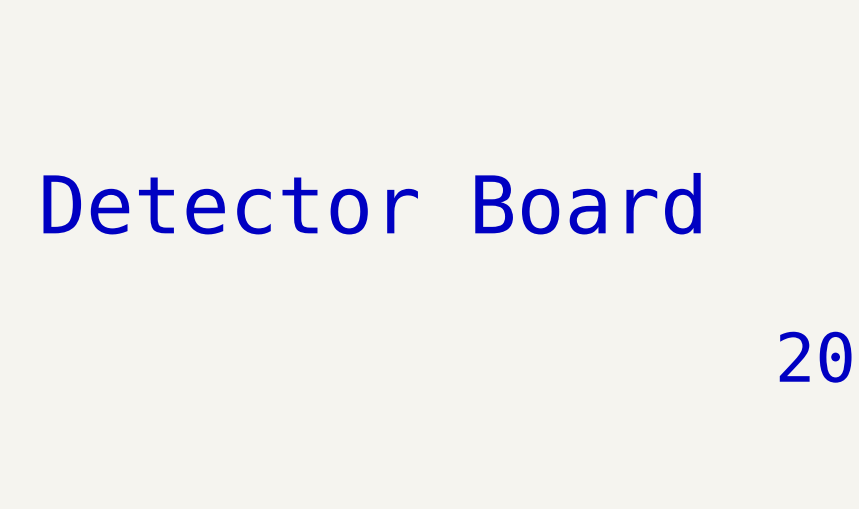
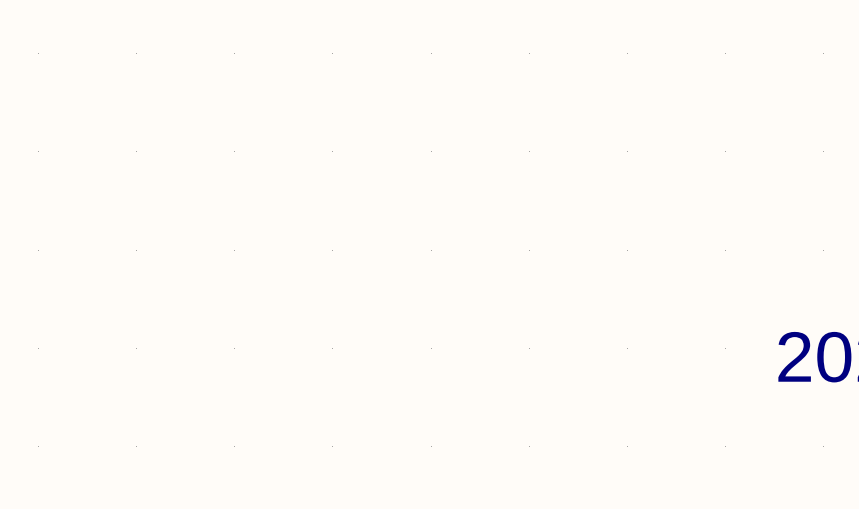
text: Detector Board (372, 203) -> none

